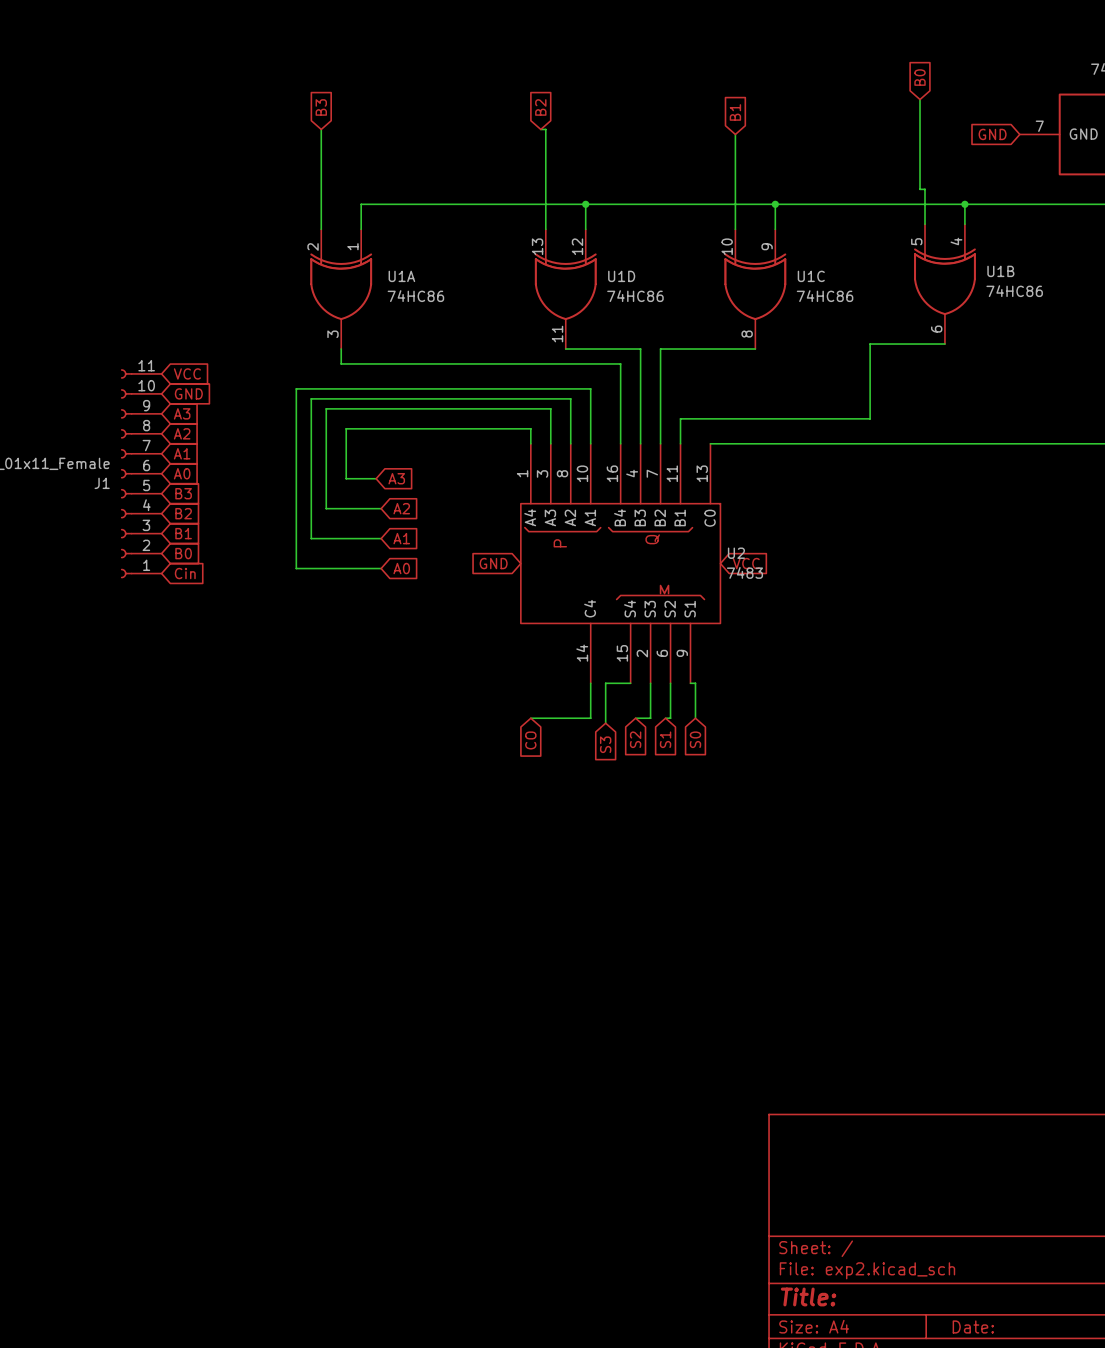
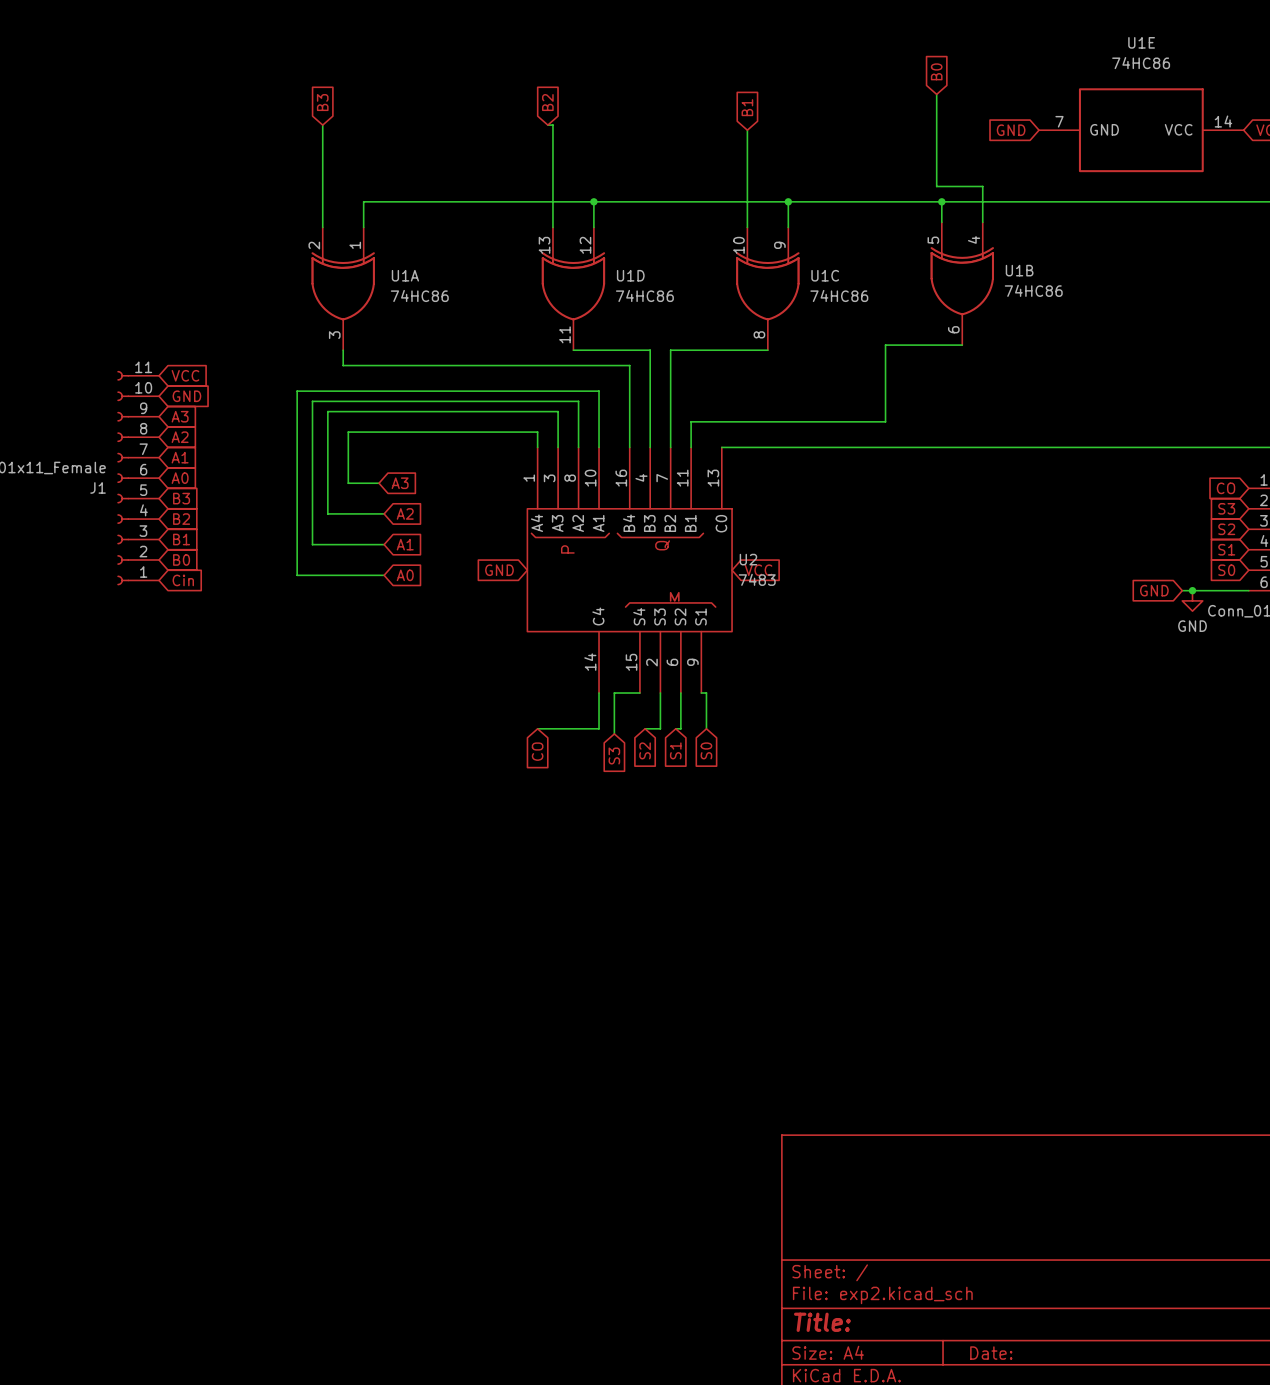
wire: (925, 189) (925, 204) -> (941, 186) (982, 186) (982, 201)
junction position: (964, 204) -> (941, 201)

